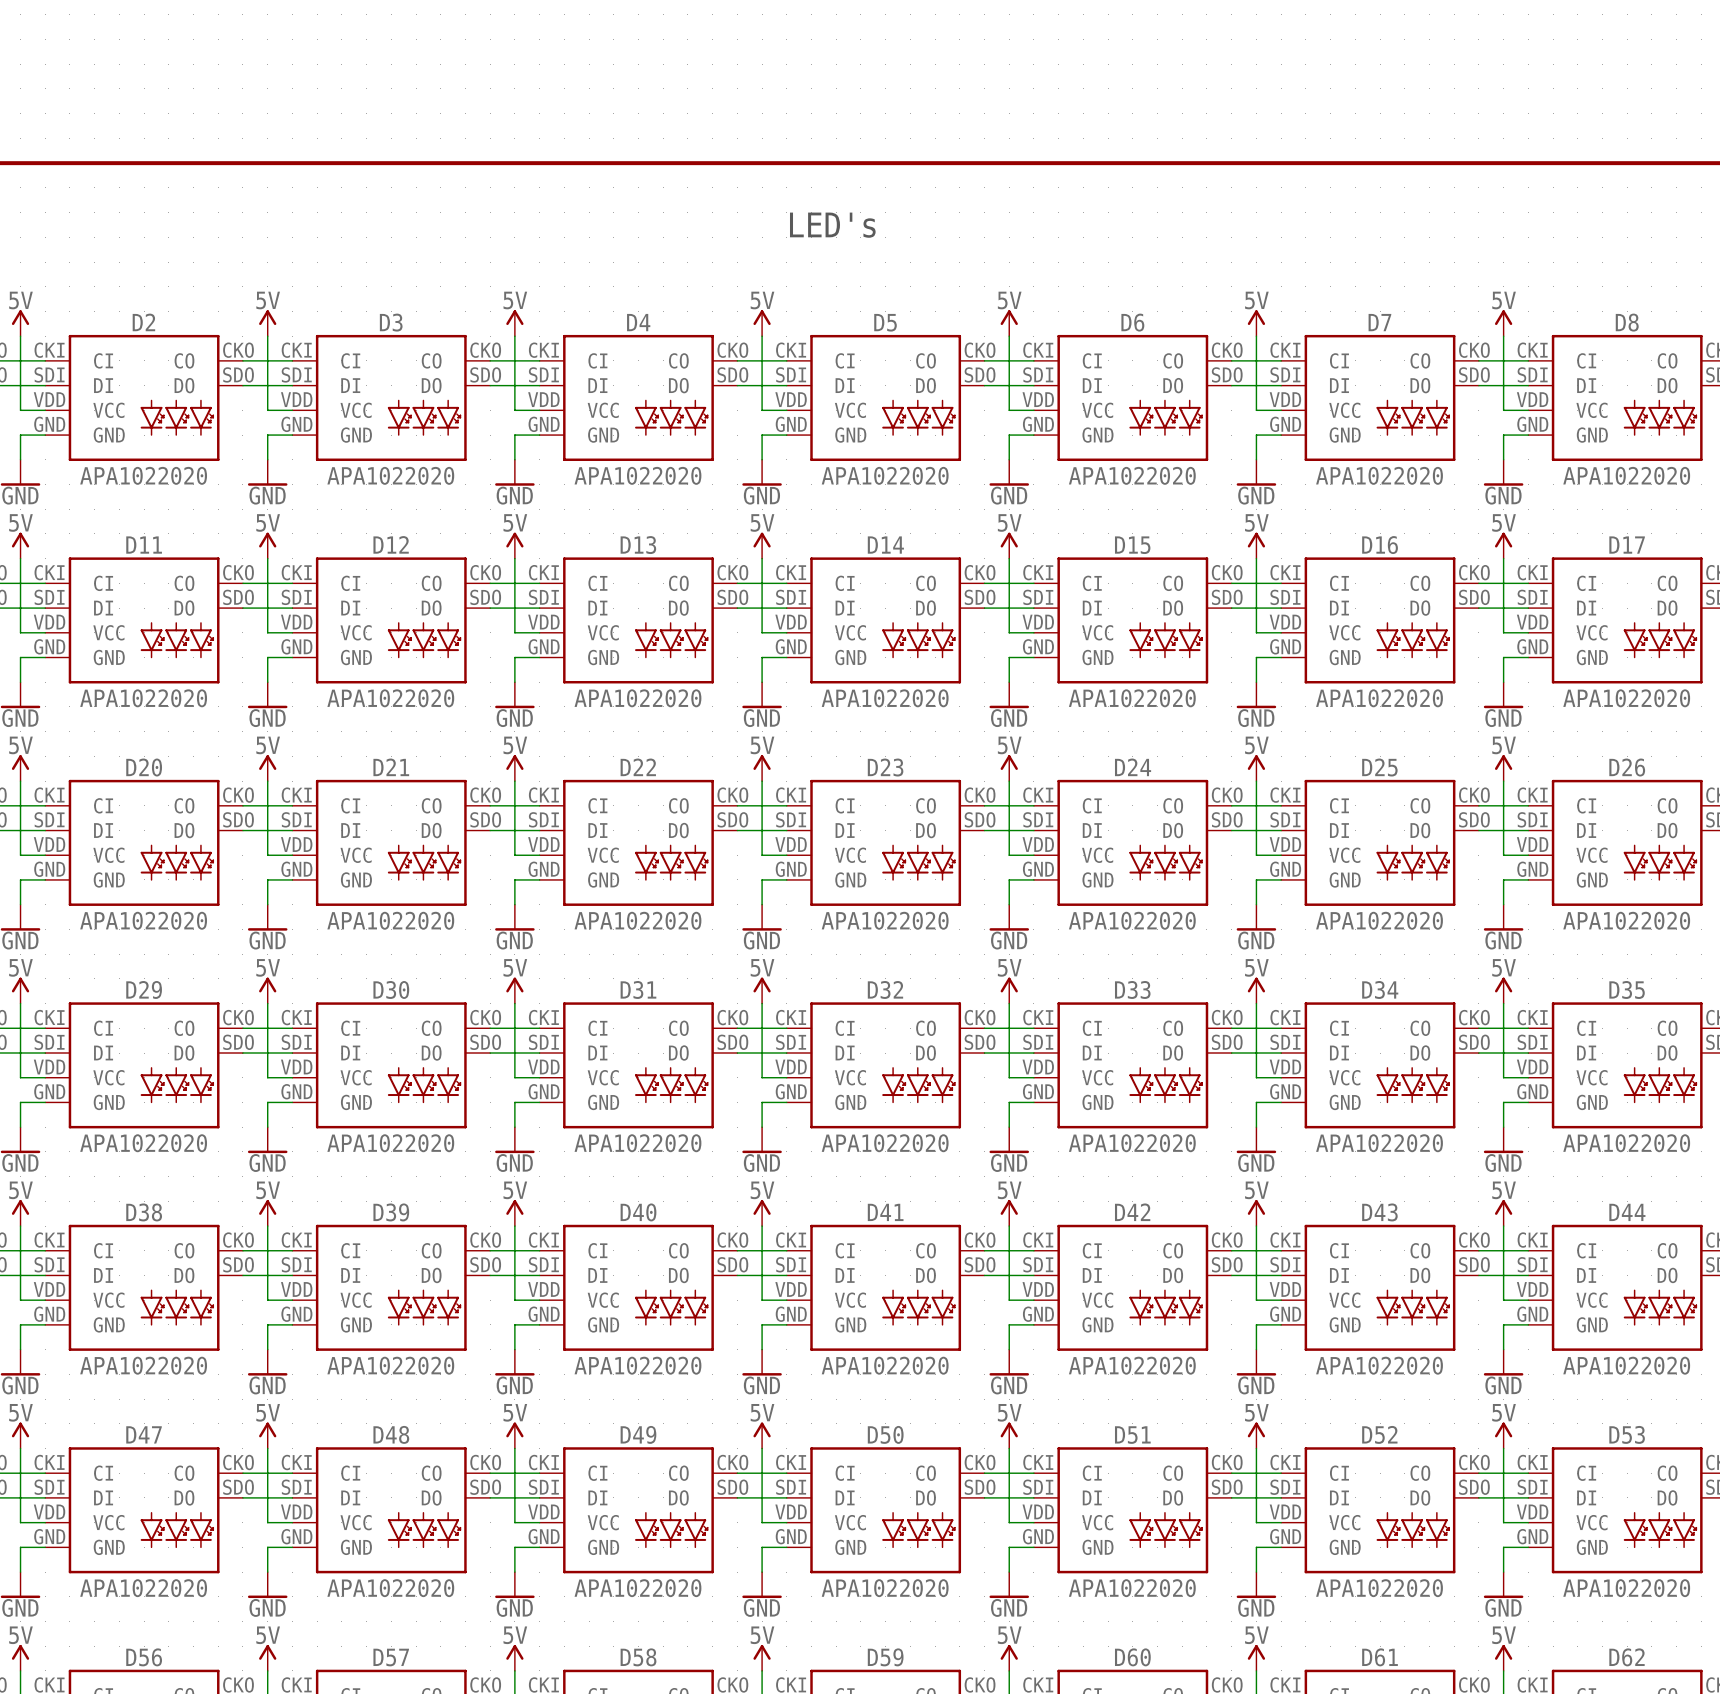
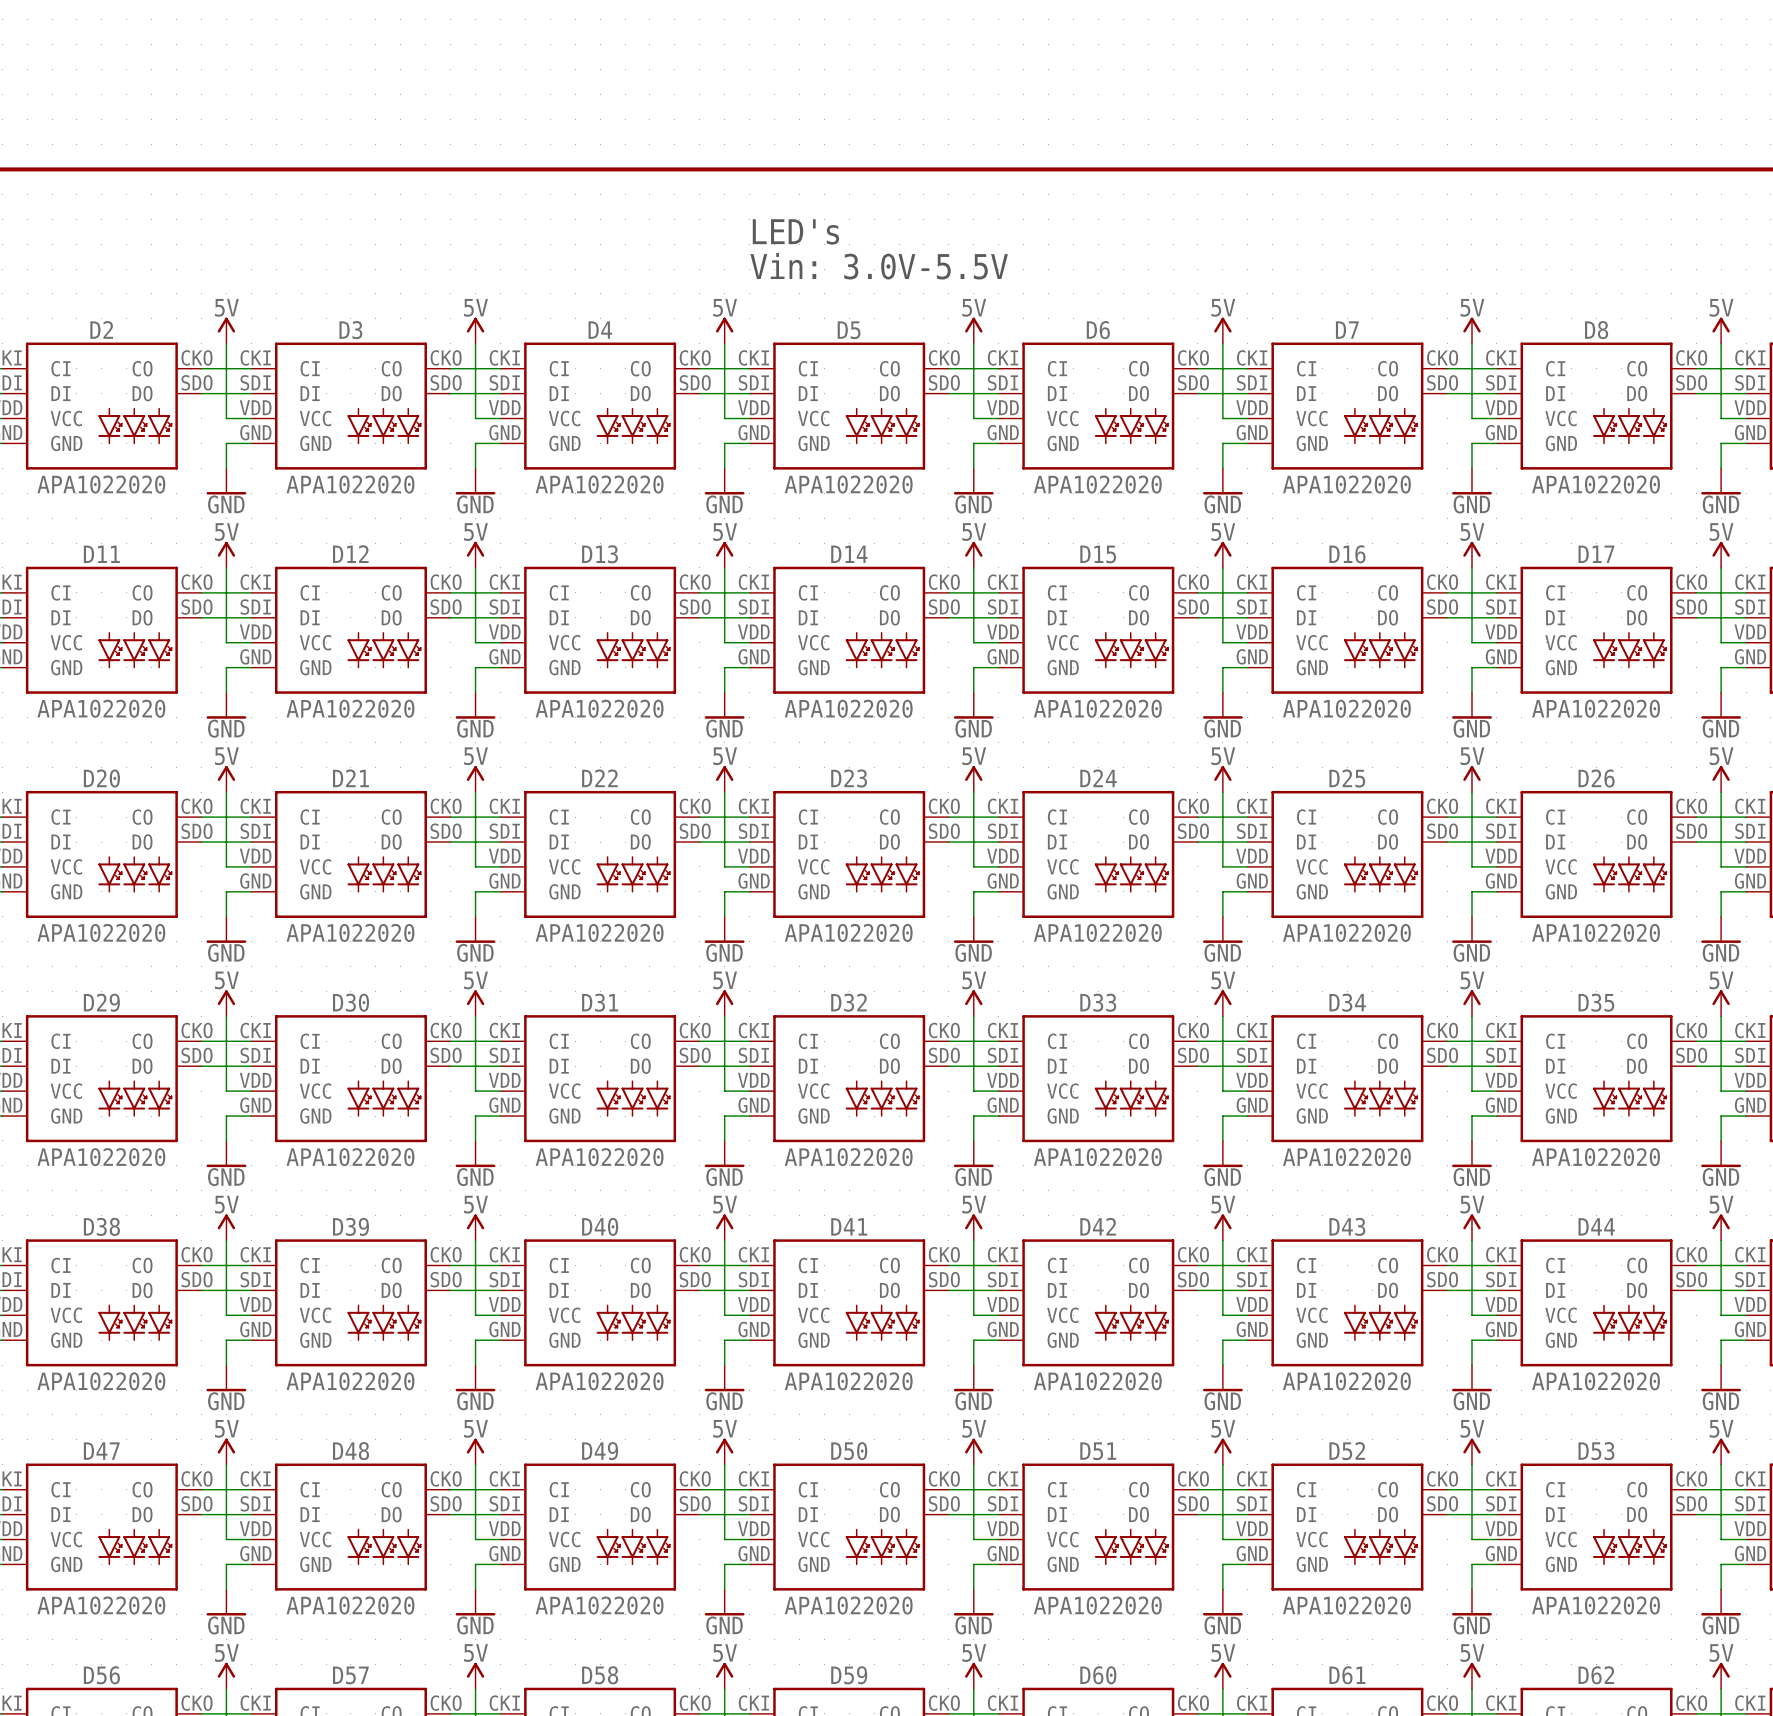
text: none -> Vin: 3.0V-5.5V (879, 266)

